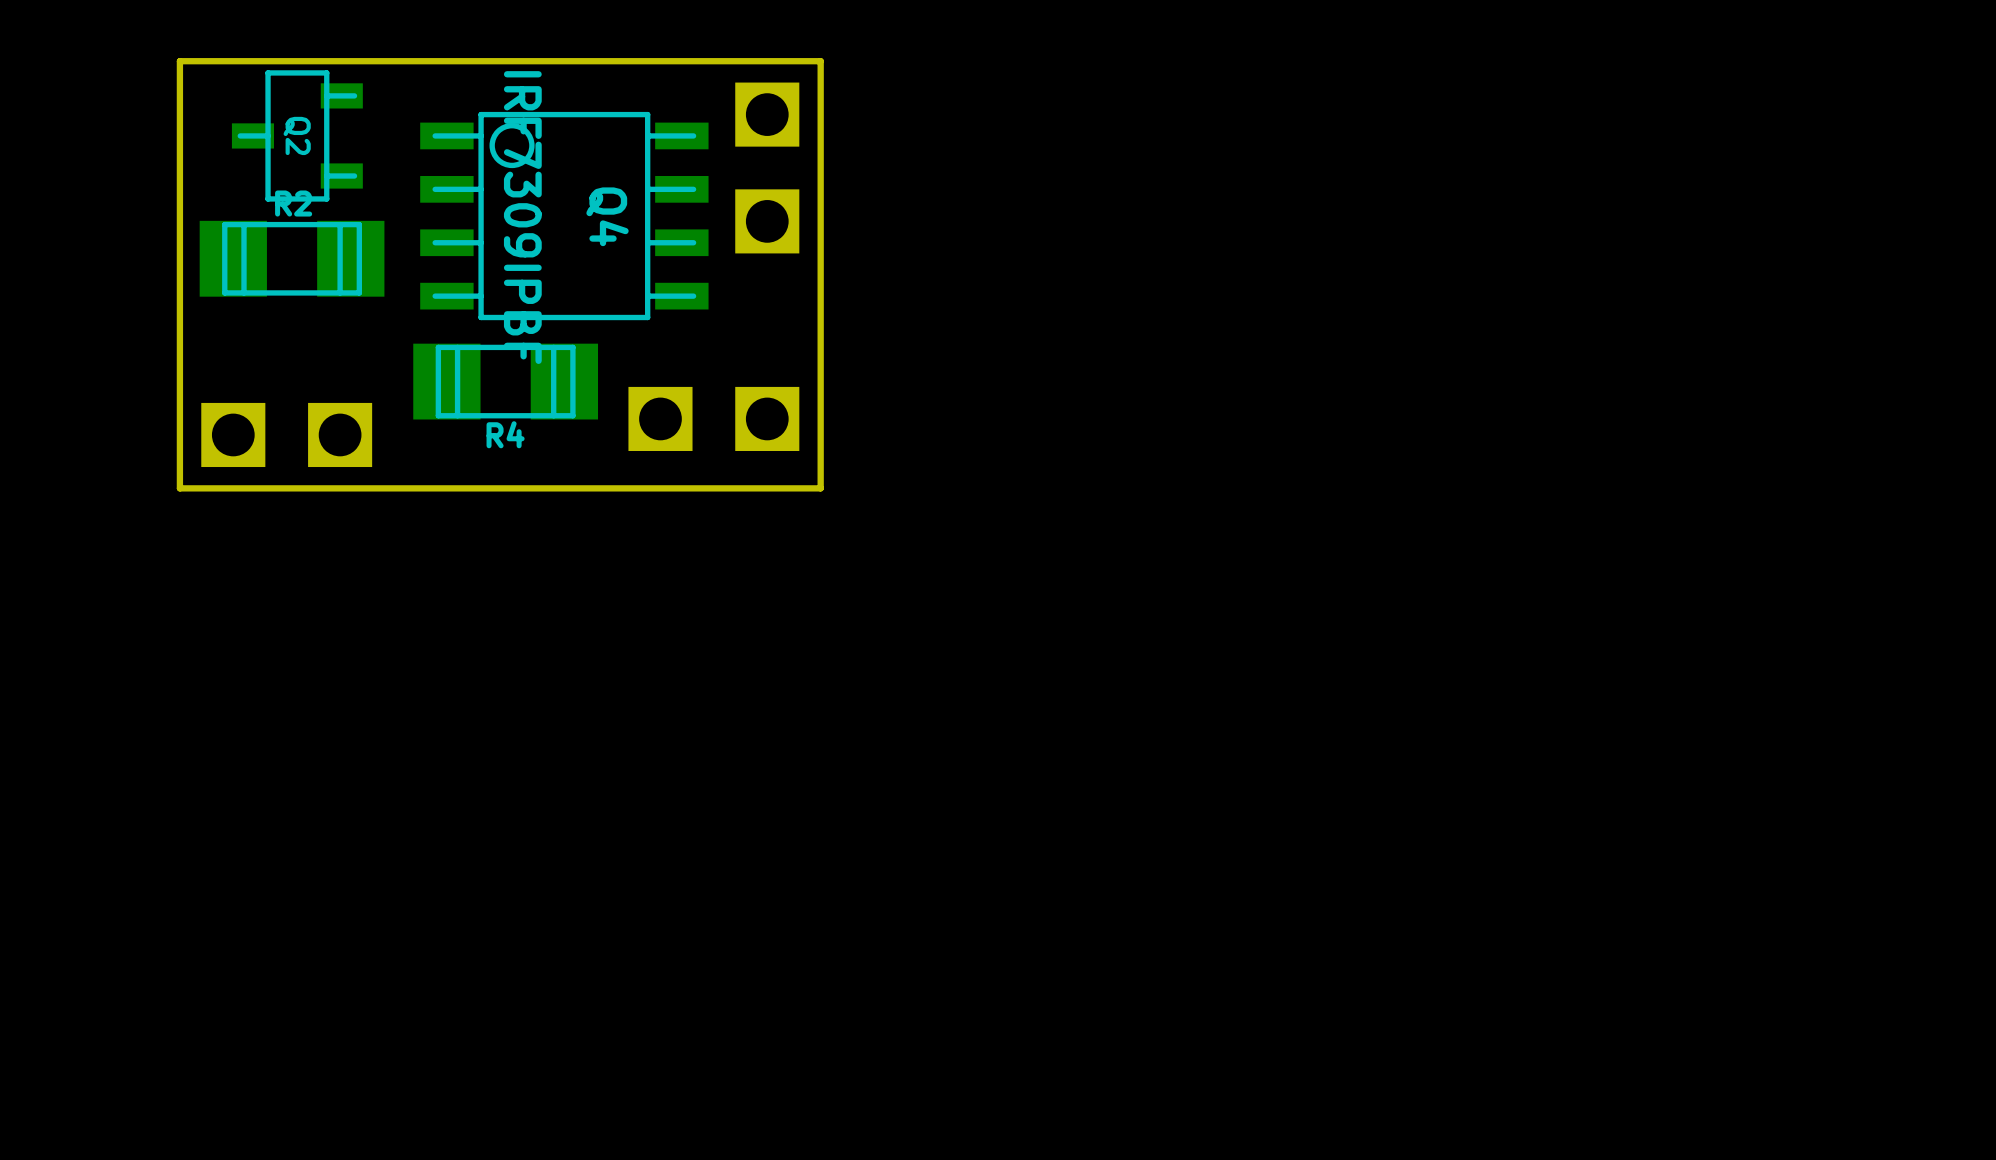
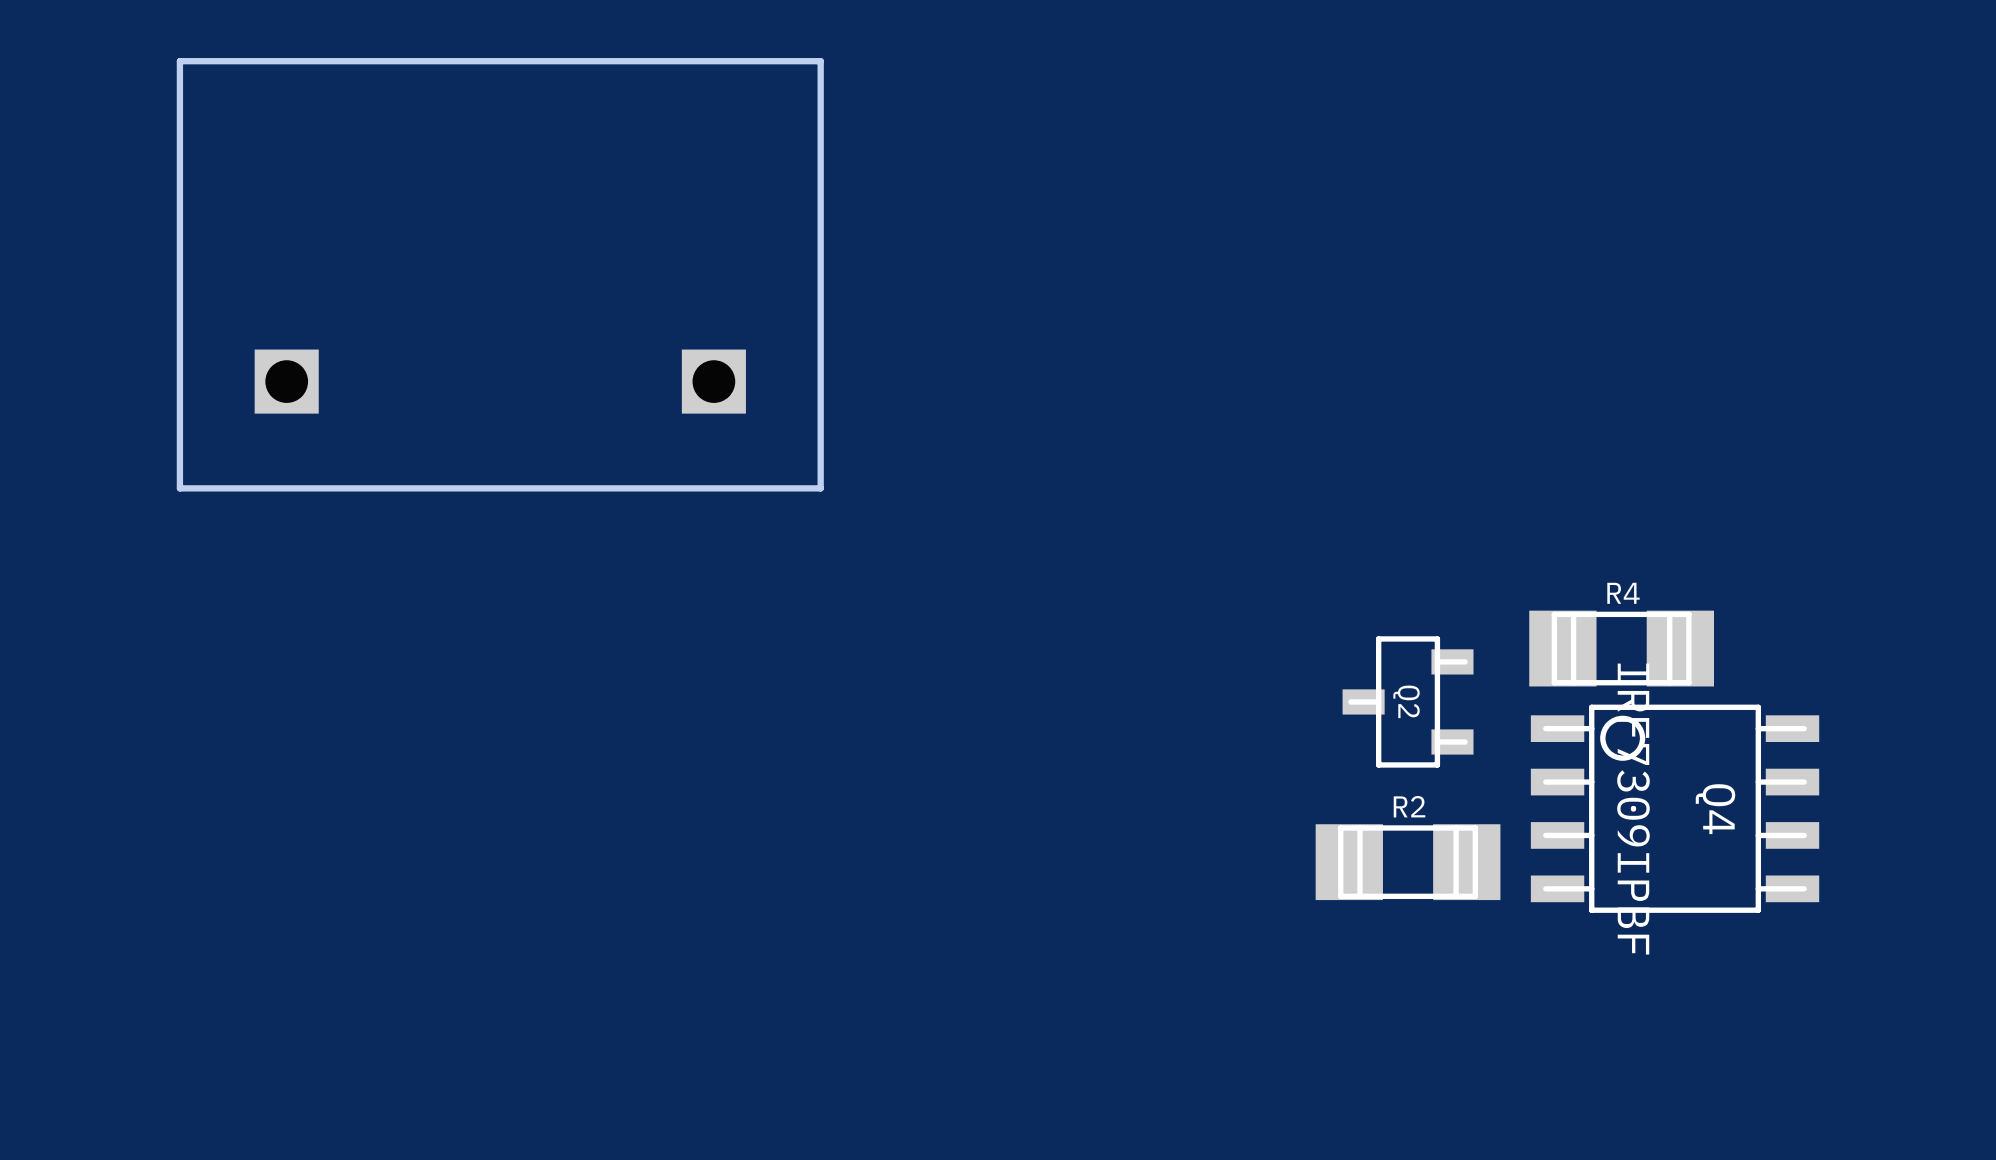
part: (767, 114) -> none
Q2 position: (297, 135) -> (1408, 701)
Q4 position: (564, 216) -> (1675, 808)
part: (767, 221) -> none
R2 position: (292, 258) -> (1408, 862)
part: none -> (286, 381)
R4 position: (505, 381) -> (1621, 648)
part: none -> (713, 381)
part: (660, 418) -> none
part: (767, 418) -> none
part: (233, 434) -> none
part: (340, 434) -> none
R4 name position: R4 (505, 434) -> R4 (1623, 593)

